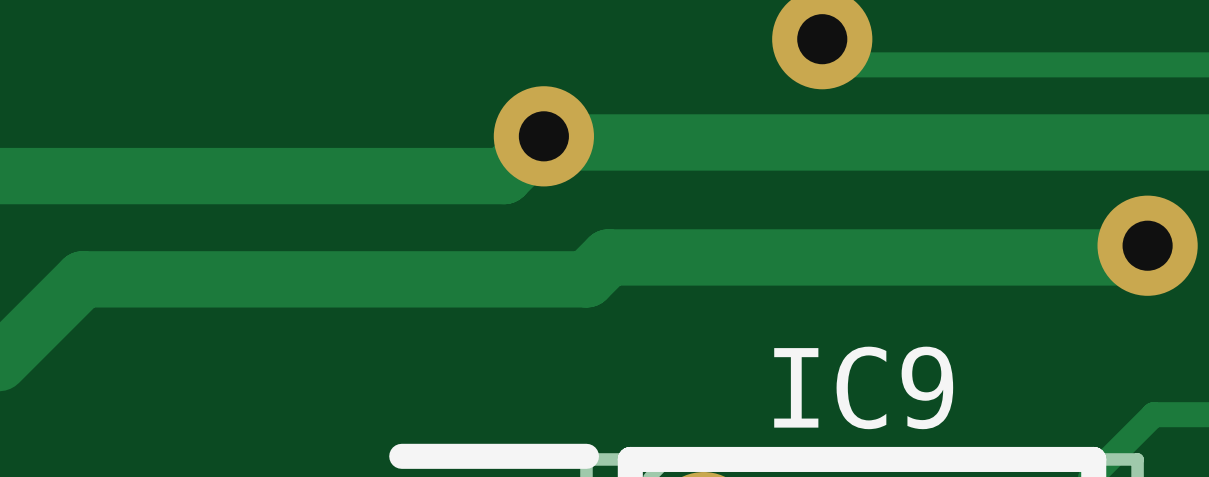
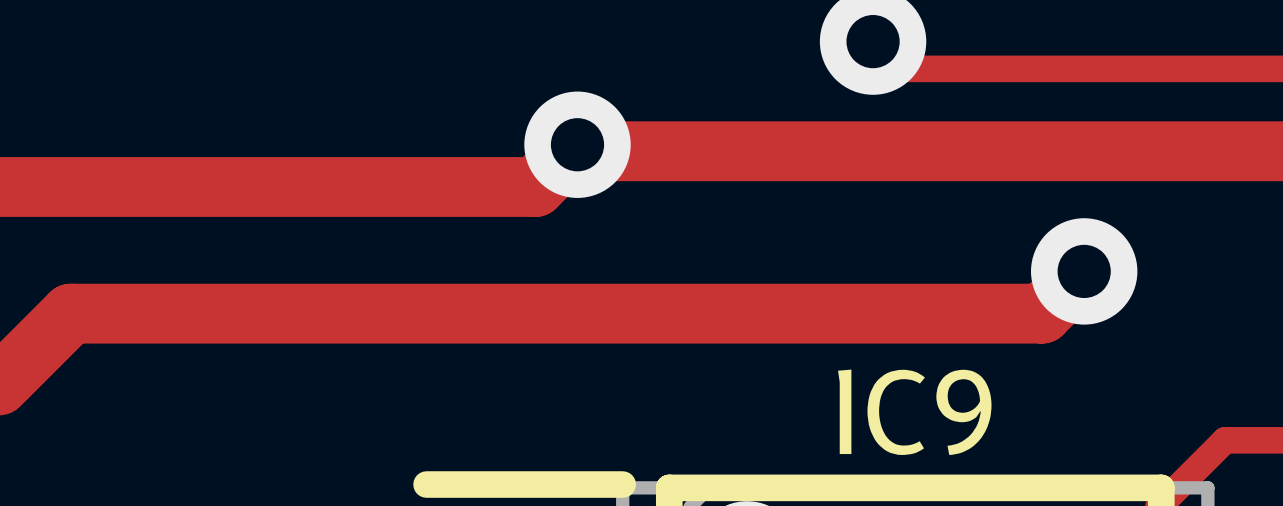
track: (1147, 245) (1135, 257) (608, 257) (586, 279) (82, 279) (66, 295) -> (1084, 271) (1041, 313) (70, 313)
via position: (1147, 245) -> (1084, 271)

